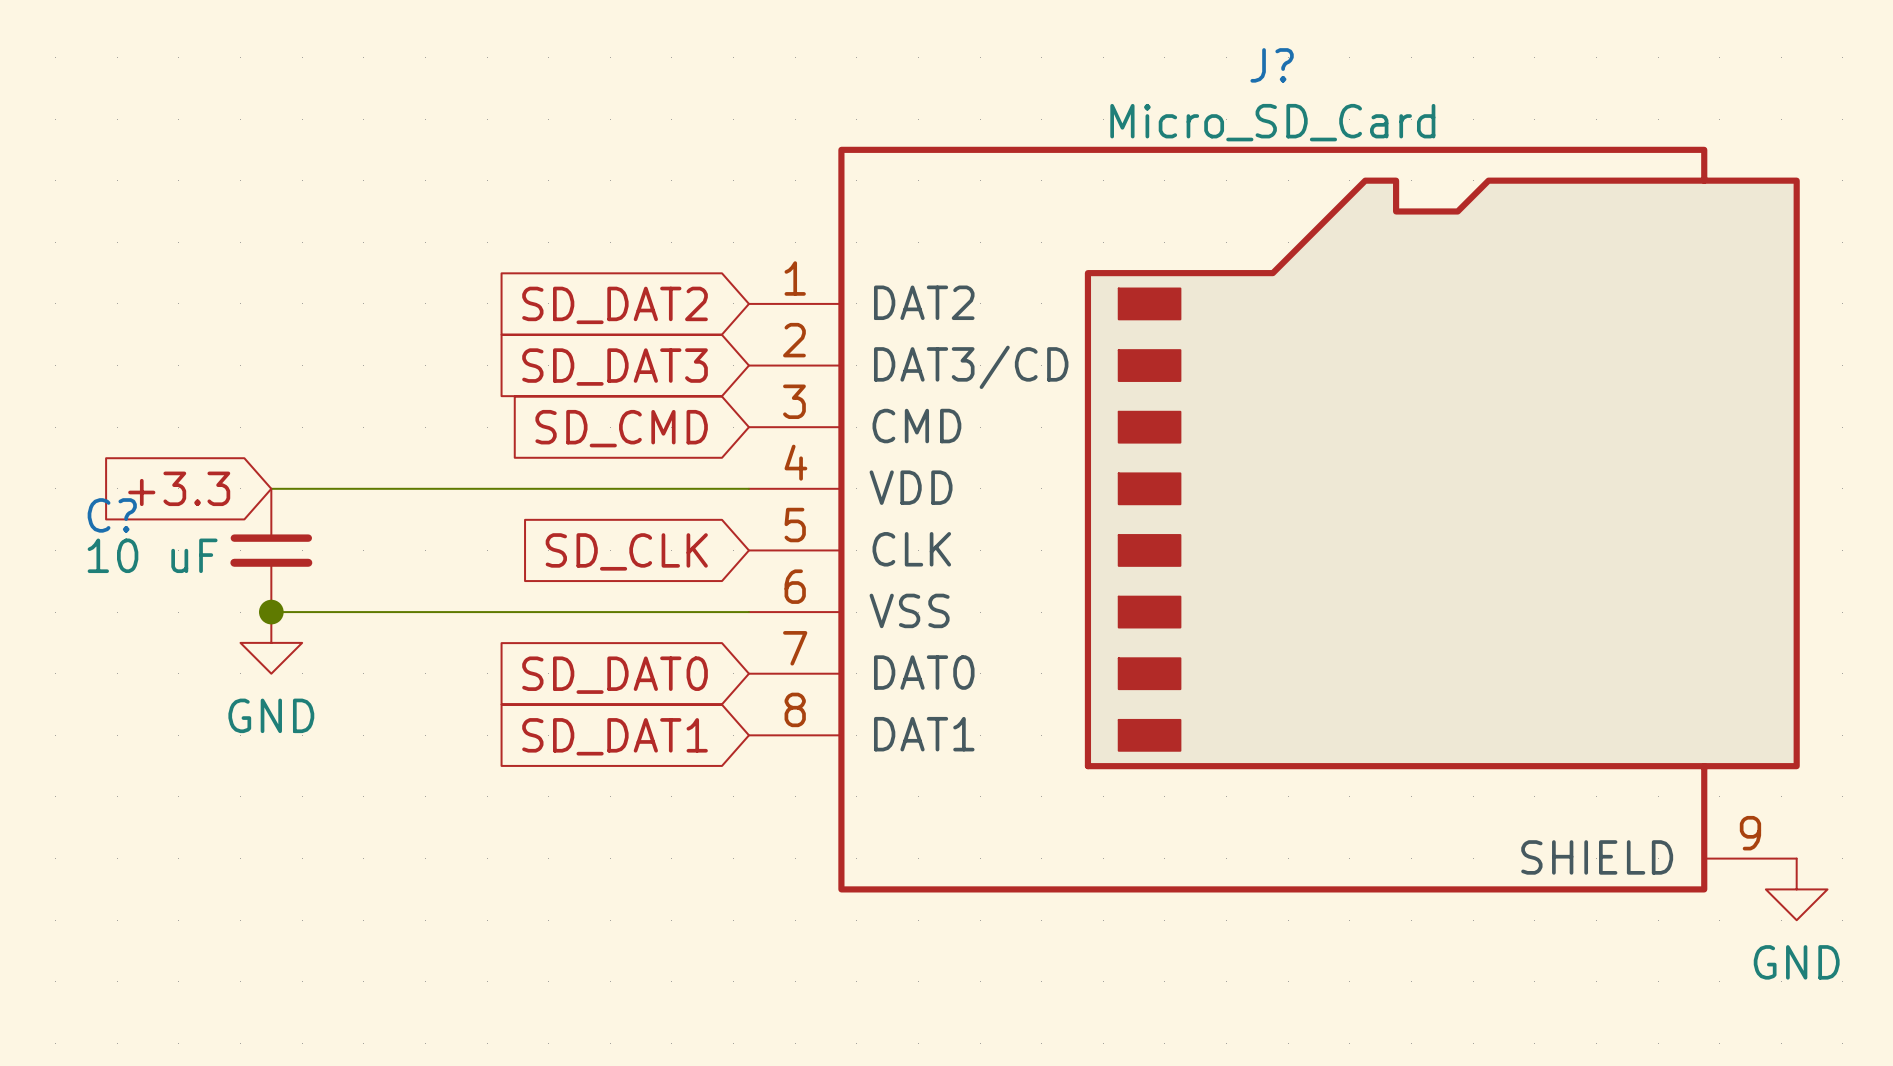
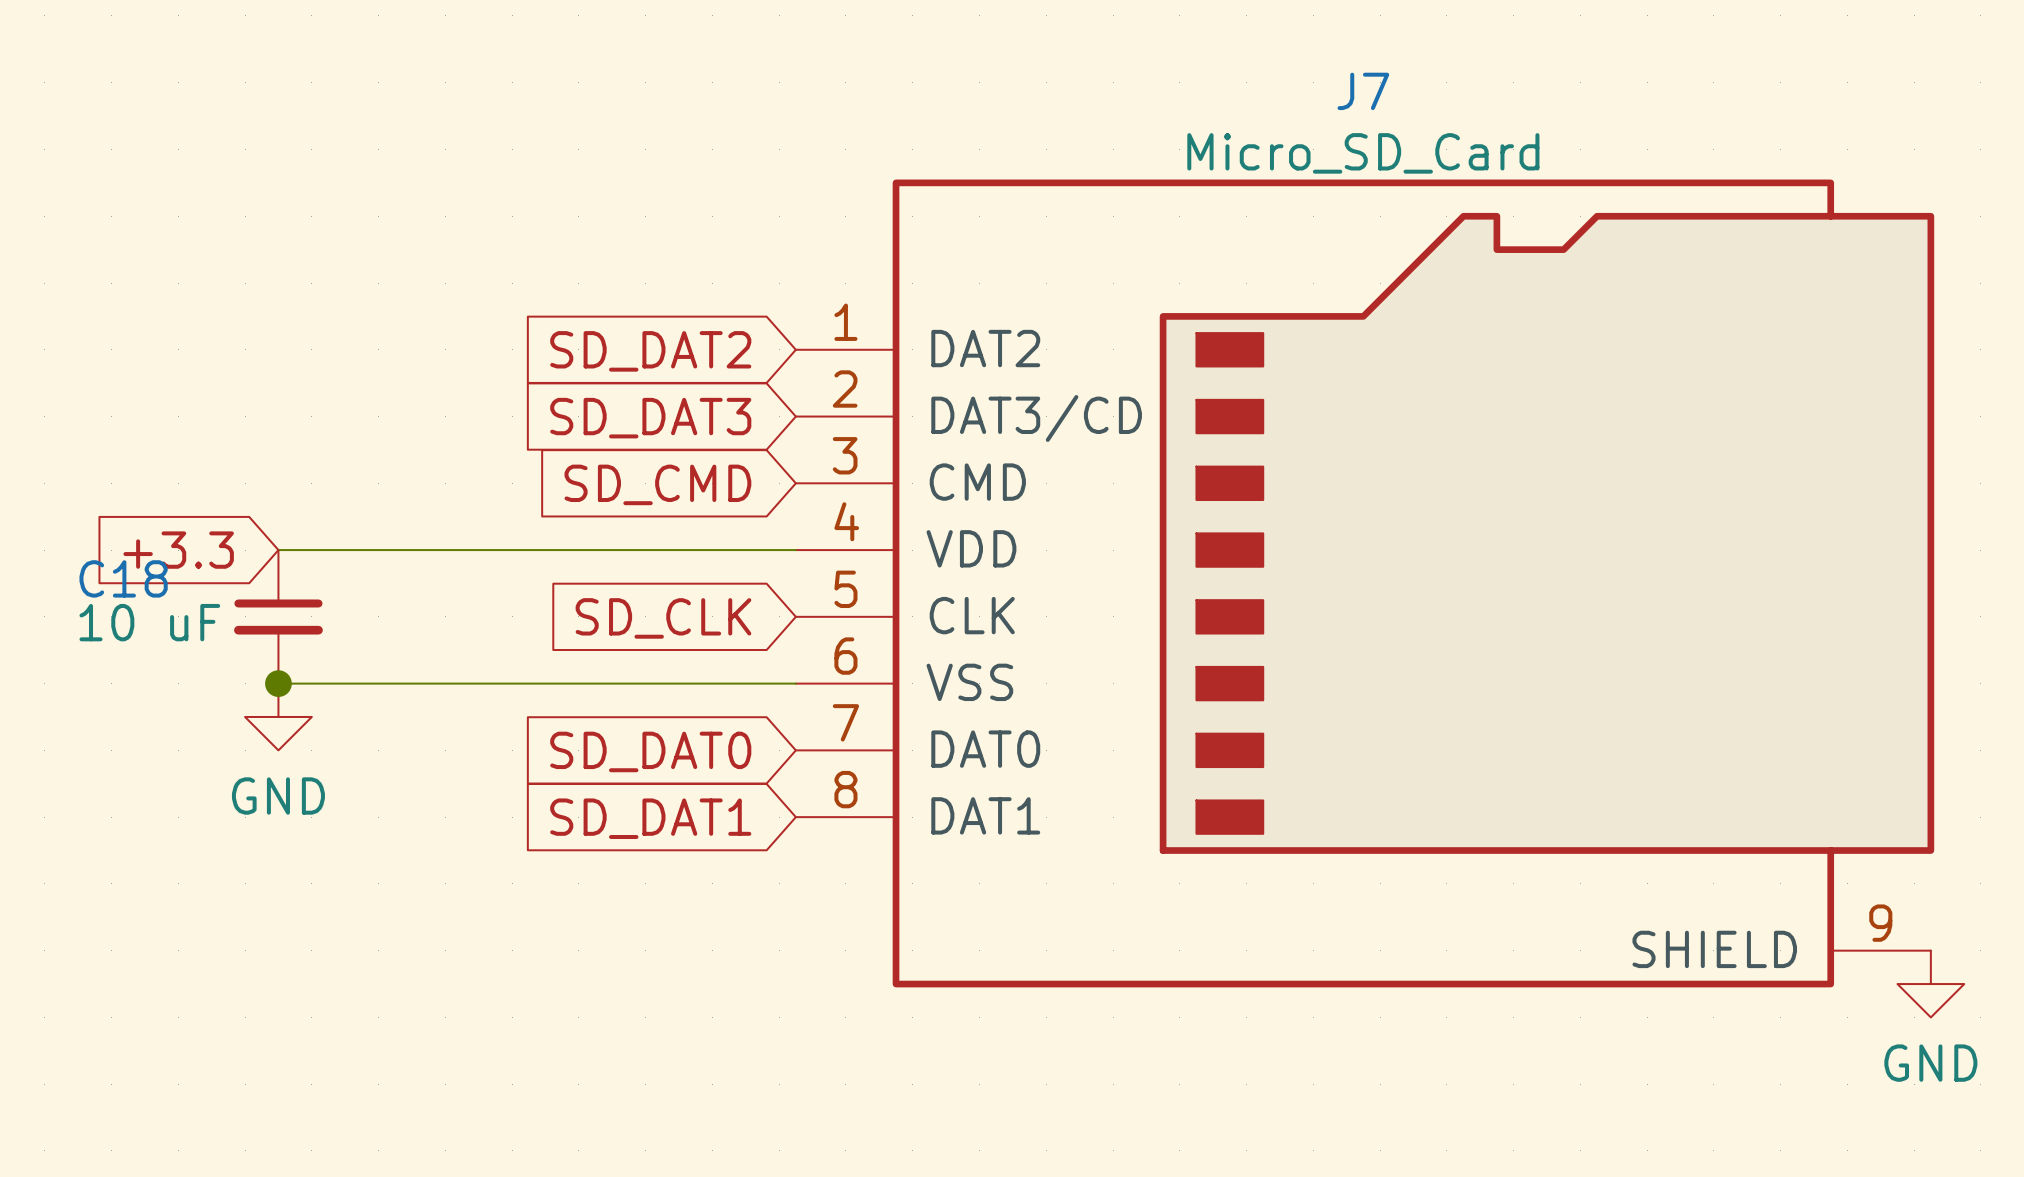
J? name: J? (1272, 65) -> J7 (1363, 91)
C? name: C? (112, 515) -> C18 (123, 578)

